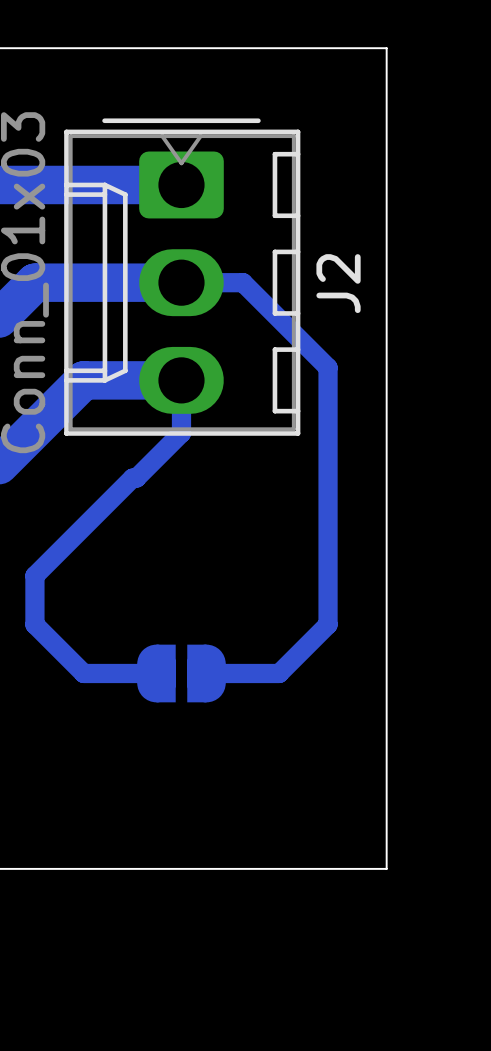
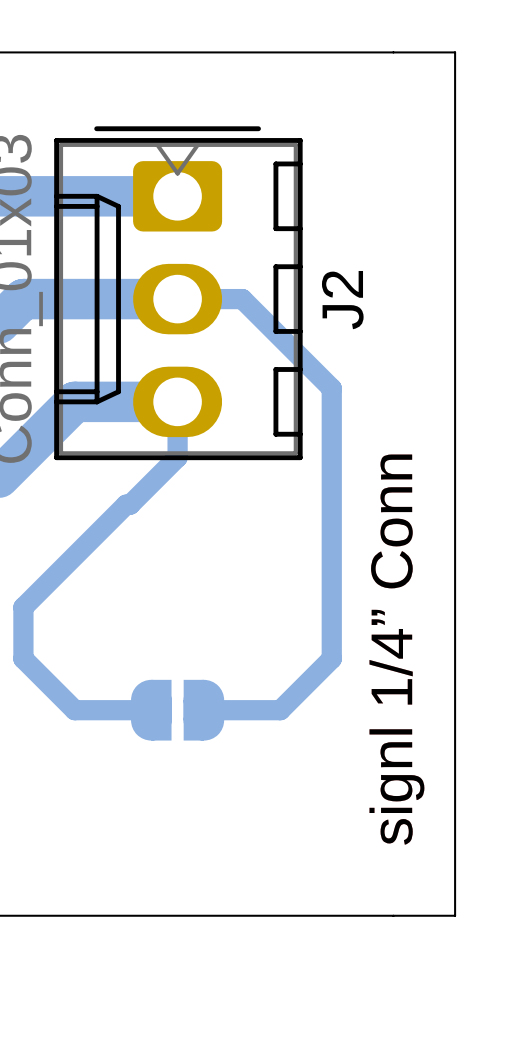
board edge: (386, 48) (386, 868) -> (393, 52) (455, 52) (455, 915) (393, 915)
text: none -> signl 1/4” Conn (396, 649)

